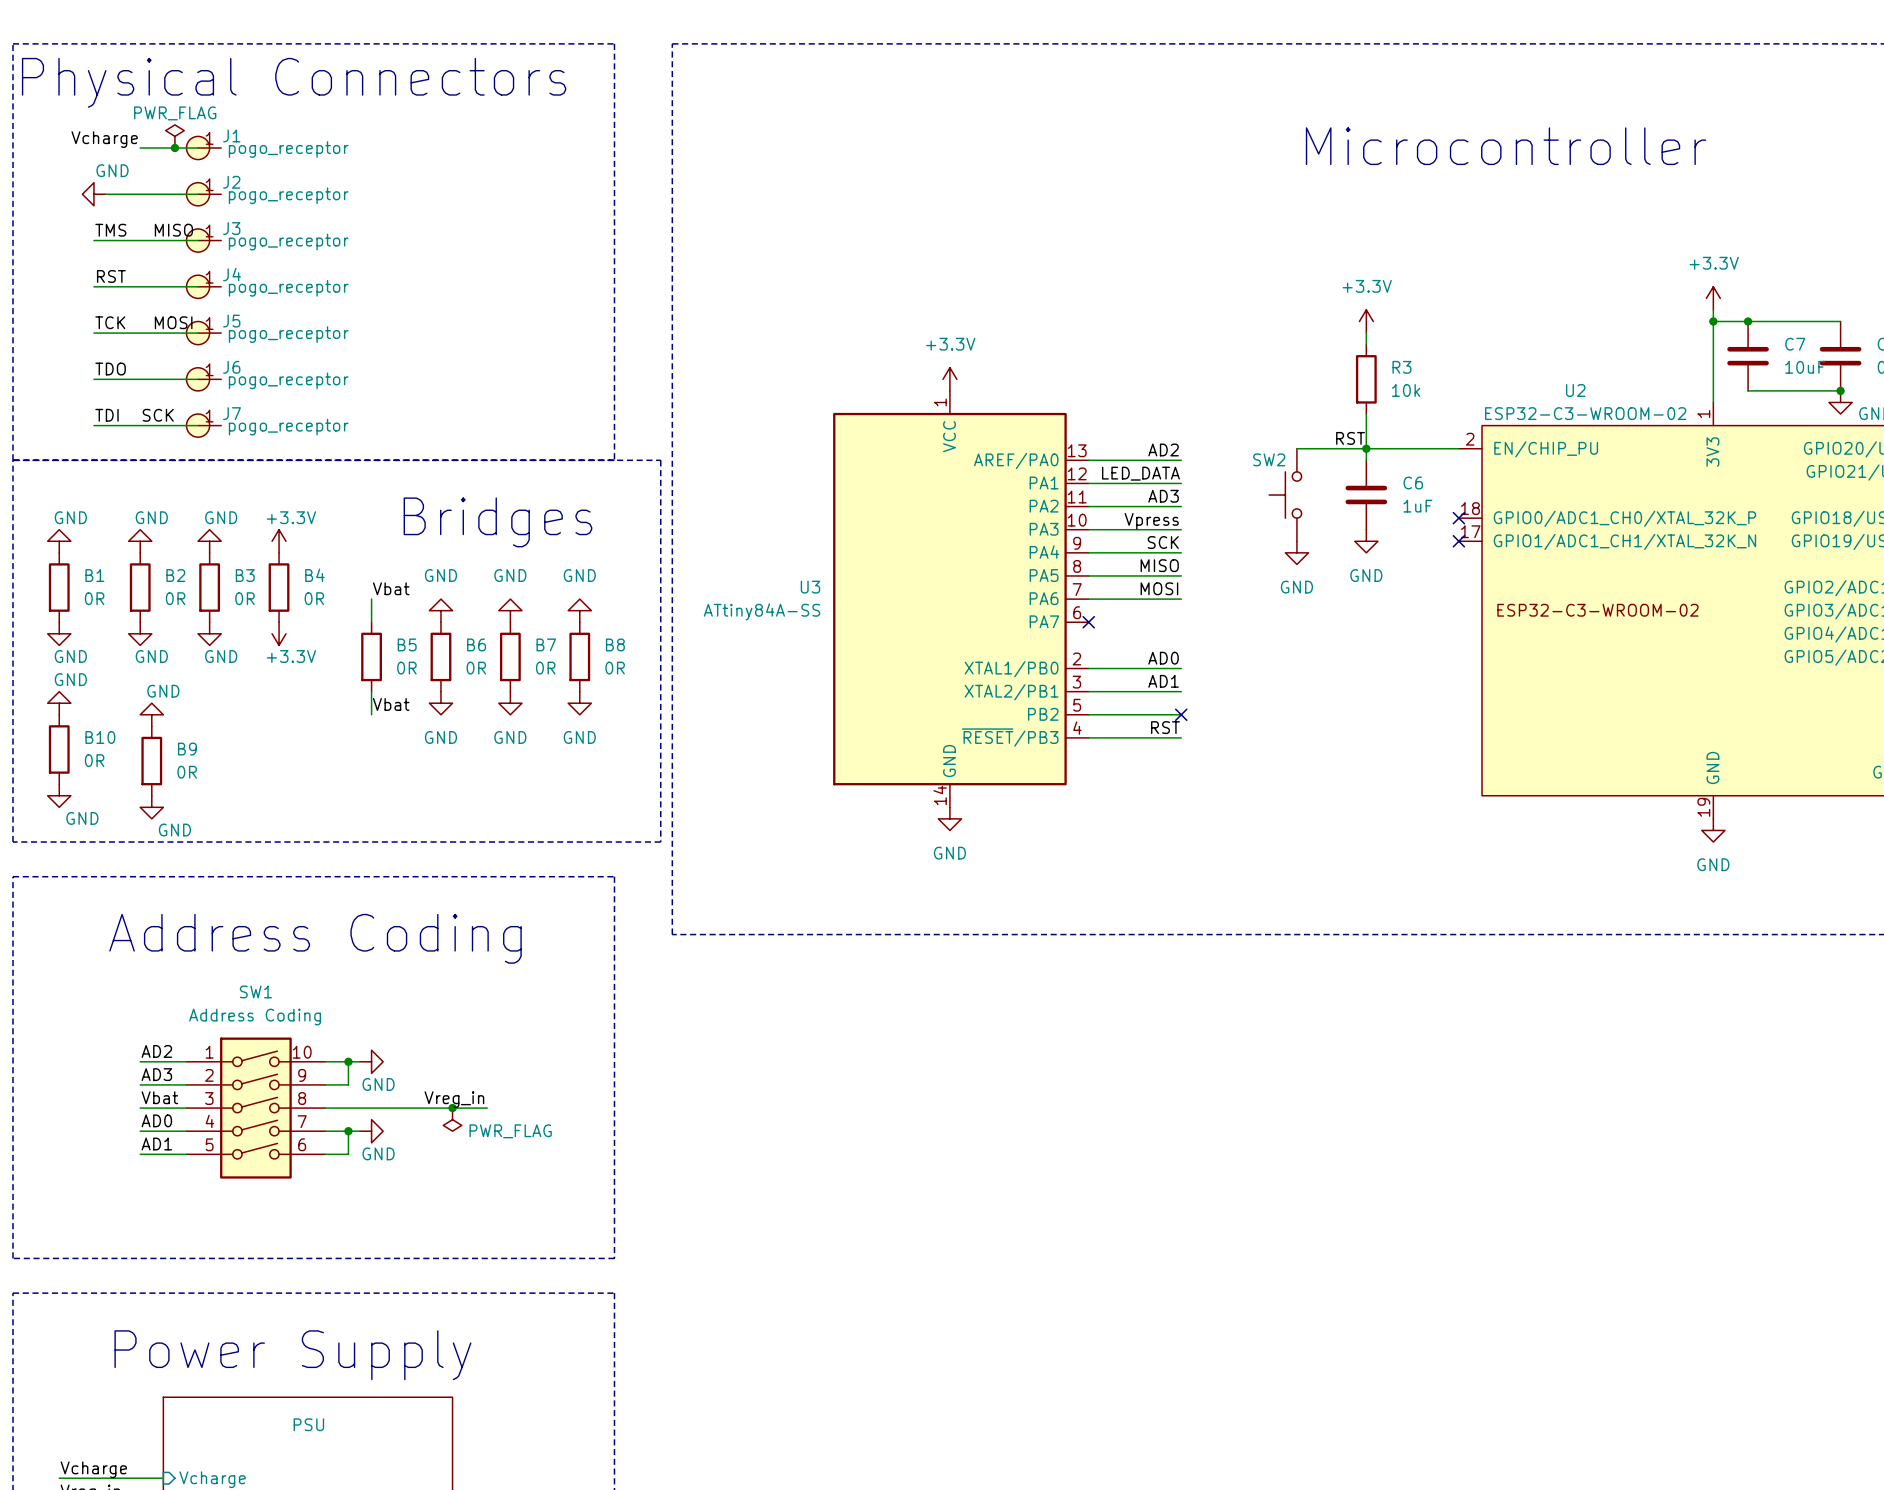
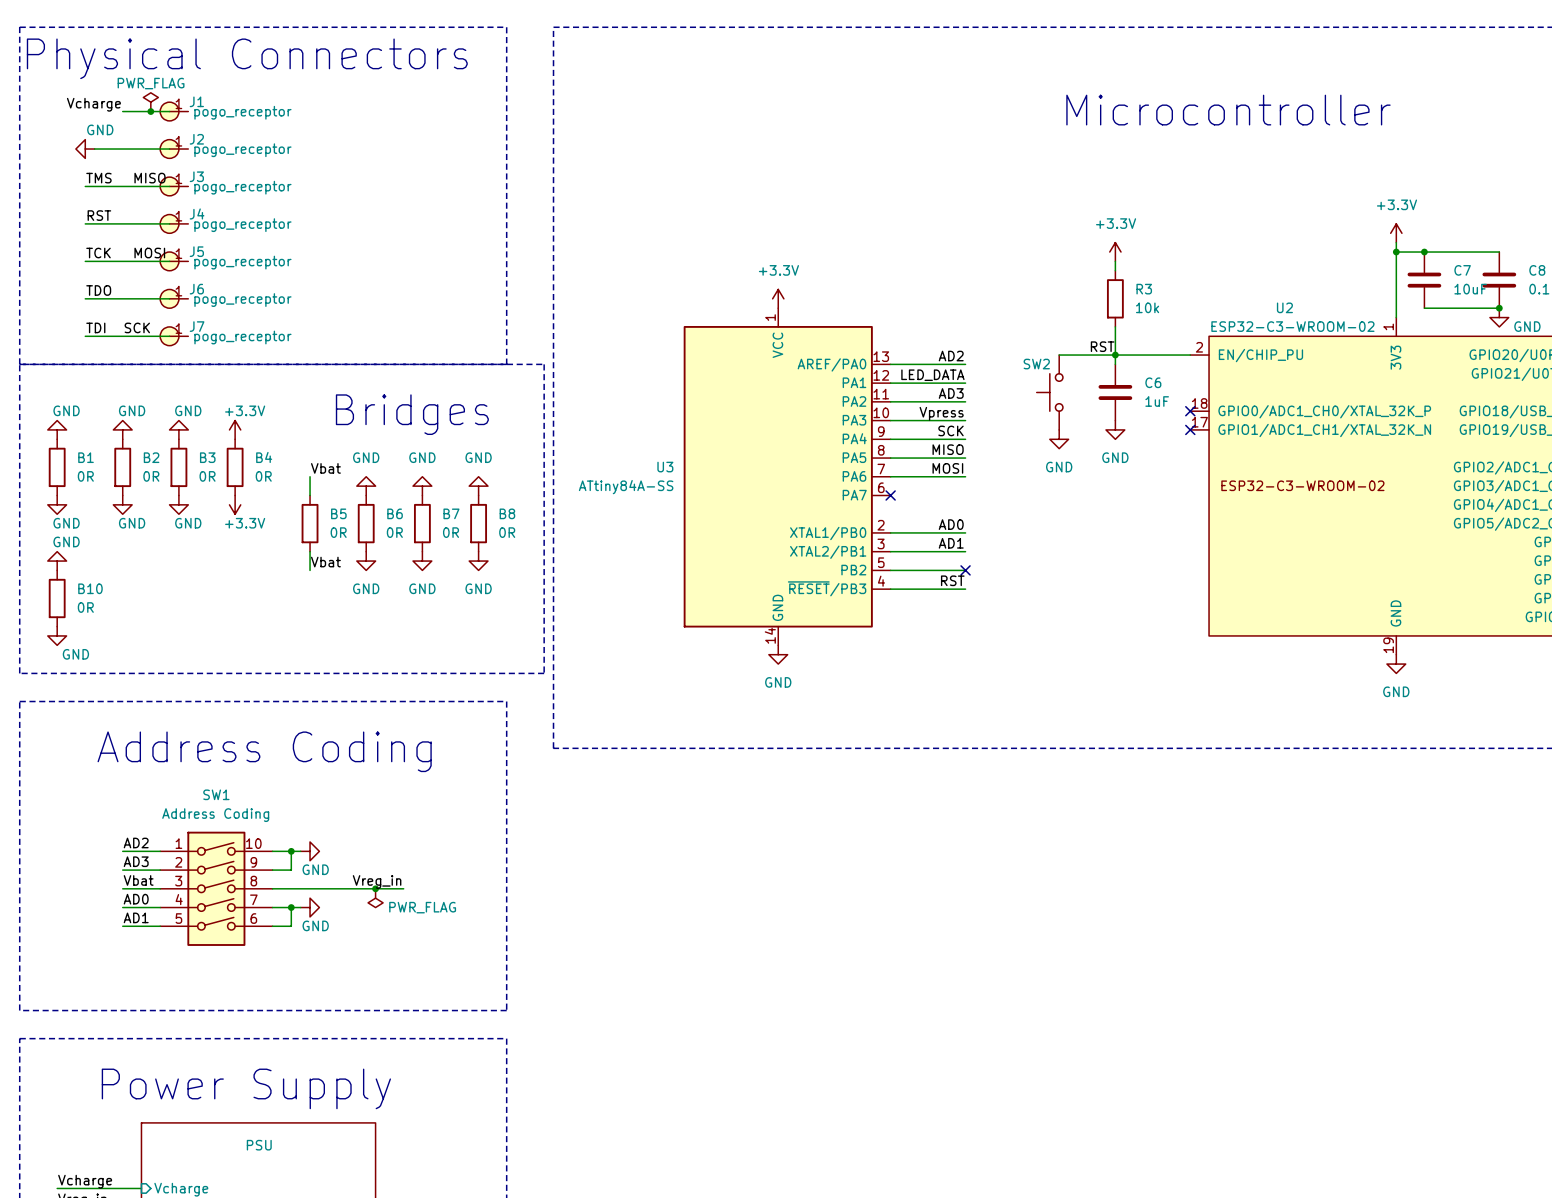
power symbol: GND (151, 714) -> none
B9: 0R (151, 761) -> none
power symbol: GND (151, 807) -> none

